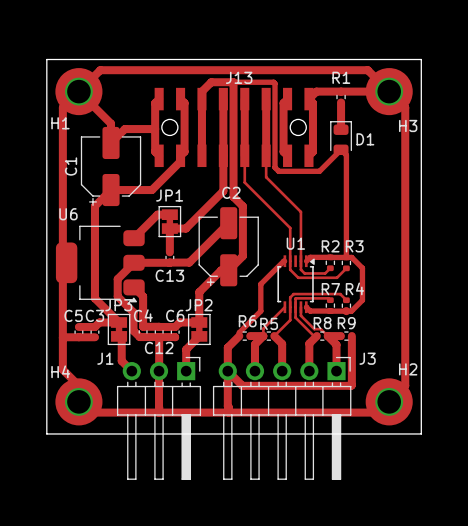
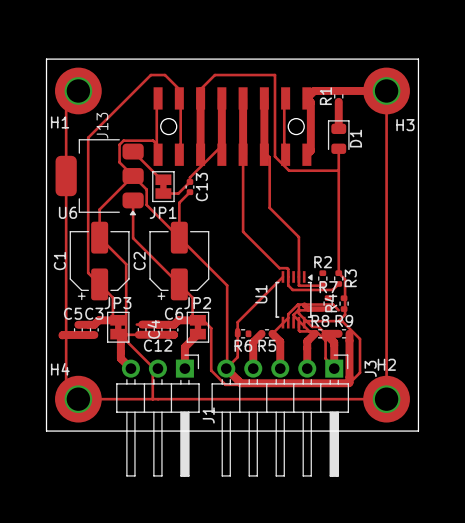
J13 name rotation: 0° (239, 77) -> 90° counterclockwise (102, 125)
J13 name position: J13 (239, 77) -> J13 (102, 125)
R1 name rotation: 0° (341, 77) -> 90° counterclockwise (325, 96)
track: (233, 82) (211, 82) (201, 91) -> (338, 170) (289, 170) (274, 156) (274, 75) (214, 75) (200, 90)
track: (233, 82) (233, 196) (242, 206) (242, 256) (228, 270) (221, 270) (199, 292) (199, 322) -> (304, 322) (342, 321) (360, 339) (360, 372) (347, 384) (225, 384) (211, 370) (211, 328) (203, 320) (197, 320)
track: (233, 82) (274, 83) (274, 167) (278, 171) (319, 171) (341, 149) (346, 155) (346, 257) -> none
track: none -> (158, 89) (156, 144)
track: none -> (285, 89) (285, 145)
track: (159, 99) (155, 103) (155, 151) (159, 155) -> none
track: (180, 99) (184, 103) (184, 151) (180, 155) (180, 161) (151, 190) (111, 190) (94, 206) (94, 298) (119, 322) (113, 322) -> (179, 145) (180, 90) (165, 75) (150, 75) (88, 137) (88, 272) (112, 297) (112, 320)
track: (287, 99) (283, 103) (283, 151) (287, 155) -> none
track: (66, 103) (62, 107) (62, 369) (78, 385) (78, 401) (89, 412) (378, 412) (405, 385) (405, 107) (367, 70) (100, 70) (78, 91) (111, 123) (111, 142) (124, 129) (155, 129) -> (66, 103) (66, 386) (78, 399) (386, 399) (386, 90)
D1 name rotation: 0° (365, 139) -> 90° counterclockwise (355, 138)
track: none -> (158, 145) (153, 140) (123, 140) (119, 144) (119, 162) (146, 189) (146, 204) (227, 285) (227, 367)
track: (223, 146) (223, 191) (185, 228) (169, 228) (169, 252) -> (221, 145) (189, 177) (189, 181) (178, 193) (163, 193)
track: none -> (338, 148) (338, 273) (345, 279) (345, 314) (338, 321)
track: none -> (133, 151) (163, 179)
track: (266, 153) (266, 177) (300, 211) (300, 238) -> none
C1 position: (111, 166) -> (99, 261)
track: none -> (133, 176) (99, 209) (99, 237) (126, 264) (126, 340) (152, 367) (152, 399)
track: (244, 182) (271, 209) -> (264, 151) (269, 157) (269, 207)
track: none -> (243, 181) (243, 231) (279, 268) (288, 269) (288, 285) (292, 289) (332, 289) (338, 283)
C2 name rotation: 0° (231, 192) -> 90° counterclockwise (139, 261)
C2 name position: C2 (231, 192) -> C2 (139, 261)
track: none -> (189, 192) (179, 202) (179, 237)
JP1 name position: JP1 (169, 195) -> JP1 (163, 212)
track: none -> (133, 200) (133, 238) (192, 297) (192, 320)
track: (169, 214) (157, 214) (134, 238) -> none
JP1 position: (169, 221) -> (163, 186)
track: (228, 223) (189, 262) (134, 262) (117, 279) (117, 296) (133, 312) (133, 330) (139, 337) -> (126, 335) (138, 334)
track: (290, 228) (290, 269) (298, 277) (336, 277) (346, 268) -> (288, 226) (298, 237)
U1 name rotation: 0° (295, 243) -> 90° counterclockwise (261, 294)
U1 name position: U1 (295, 243) -> U1 (261, 294)
C2 position: (228, 246) -> (179, 261)
R3 name rotation: 0° (354, 246) -> 90° counterclockwise (350, 278)
C13 position: (169, 257) -> (189, 187)
track: (330, 257) (310, 257) (306, 261) -> none
track: (330, 257) (351, 257) (362, 268) (362, 300) (351, 311) (330, 311) -> none
track: (284, 261) (260, 284) (260, 311) (239, 332) -> (282, 276) (237, 322) (237, 330)
R2 position: (330, 262) -> (322, 278)
R3 position: (346, 262) -> (338, 278)
U6 position: (100, 264) -> (99, 177)
track: (330, 268) (325, 273) (304, 273) (300, 269) -> (322, 283) (321, 285) (299, 285) (298, 267)
C13 name rotation: 0° (169, 275) -> 90° counterclockwise (201, 187)
U1 position: (296, 284) -> (294, 299)
track: (134, 287) (143, 296) (143, 326) -> (136, 324) (142, 324)
R4 name rotation: 0° (354, 288) -> 90° counterclockwise (330, 303)
track: (330, 300) (328, 298) (295, 298) (295, 317) -> (322, 310) (298, 310) (293, 314)
track: (346, 300) (340, 294) (293, 294) (290, 297) (290, 316) -> (338, 310) (332, 304) (297, 304) (288, 314)
track: (284, 307) (263, 328) (263, 336) (250, 336) -> none
C4 name rotation: 0° (143, 315) -> 90° counterclockwise (153, 329)
R6 name position: R6 (247, 321) -> R6 (243, 345)
R5 name position: R5 (269, 323) -> R5 (267, 345)
track: none -> (298, 322) (299, 331) (316, 331) (325, 340) (325, 358) (334, 367)
track: (239, 336) (227, 347) (228, 412) -> (237, 333) (237, 357) (226, 368)
track: (159, 337) (159, 412) -> none
J1 name rotation: 0° (105, 358) -> 90° counterclockwise (208, 415)
J1 name position: J1 (105, 358) -> J1 (208, 415)
J3 name rotation: 0° (367, 358) -> 90° counterclockwise (370, 368)
H2 name position: H2 (408, 369) -> H2 (386, 364)

